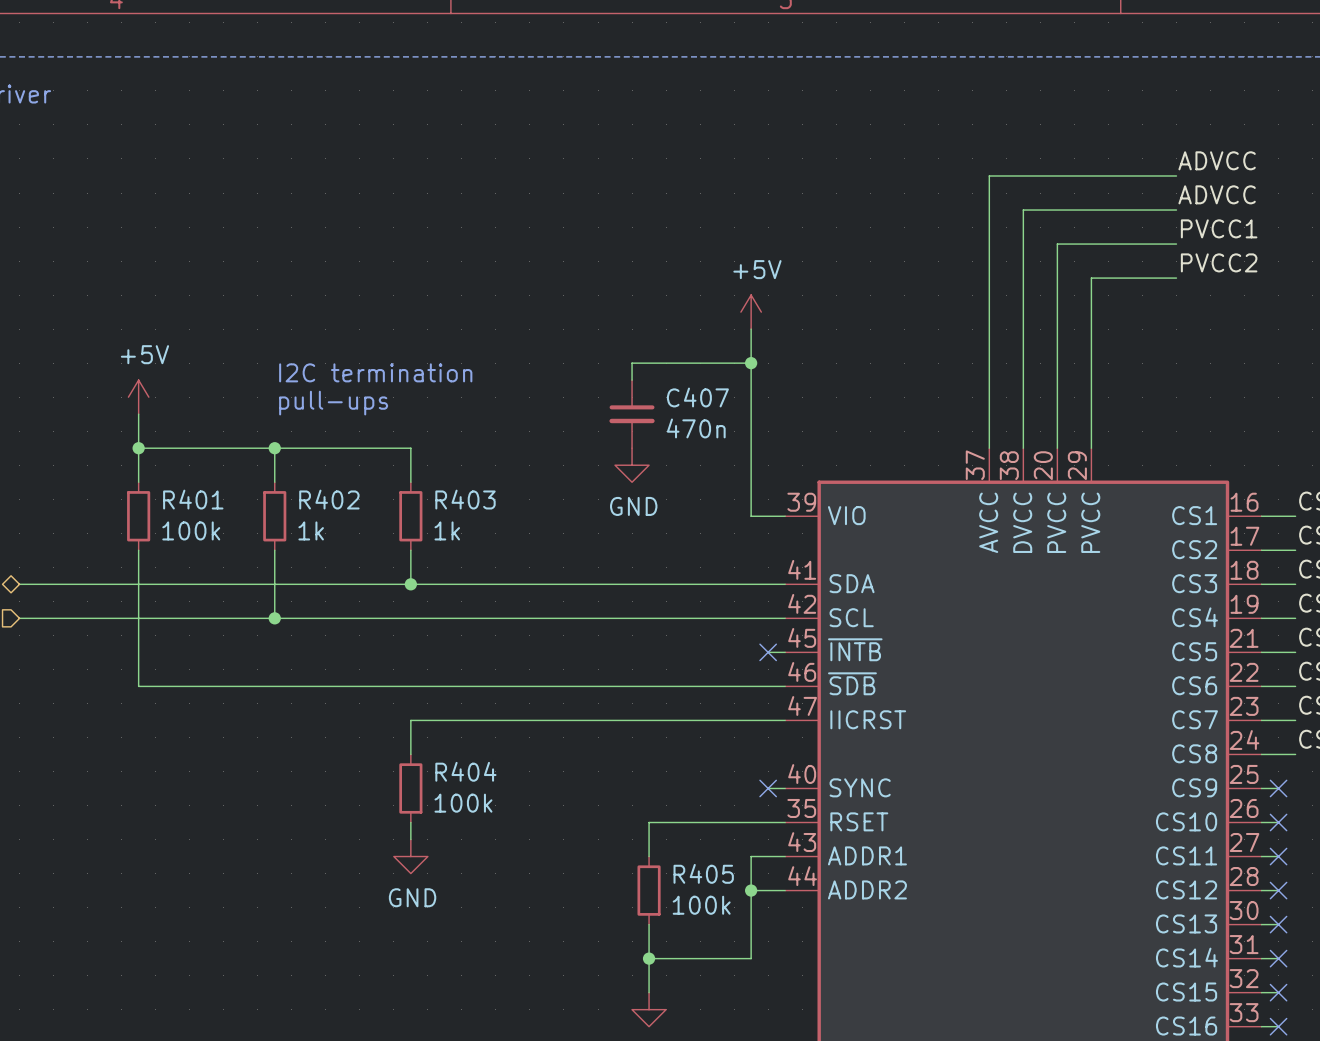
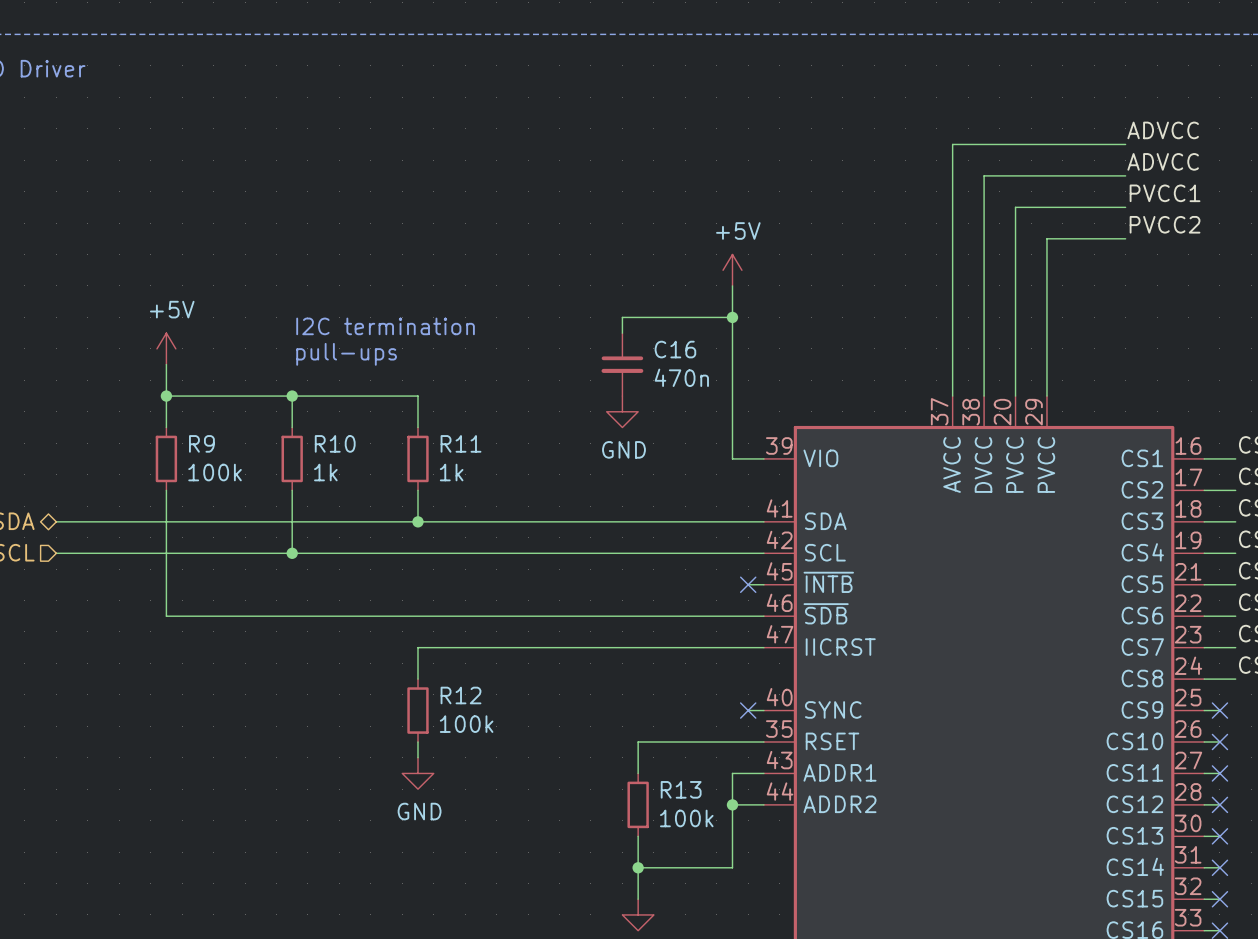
C407 name: C407 (697, 397) -> C16 (675, 349)
R401 name: R401 (193, 499) -> R9 (201, 443)
R402 name: R402 (329, 499) -> R10 (335, 443)
R403 name: R403 (465, 499) -> R11 (461, 443)
R404 name: R404 (465, 771) -> R12 (461, 695)
R405 name: R405 (703, 873) -> R13 (681, 789)

